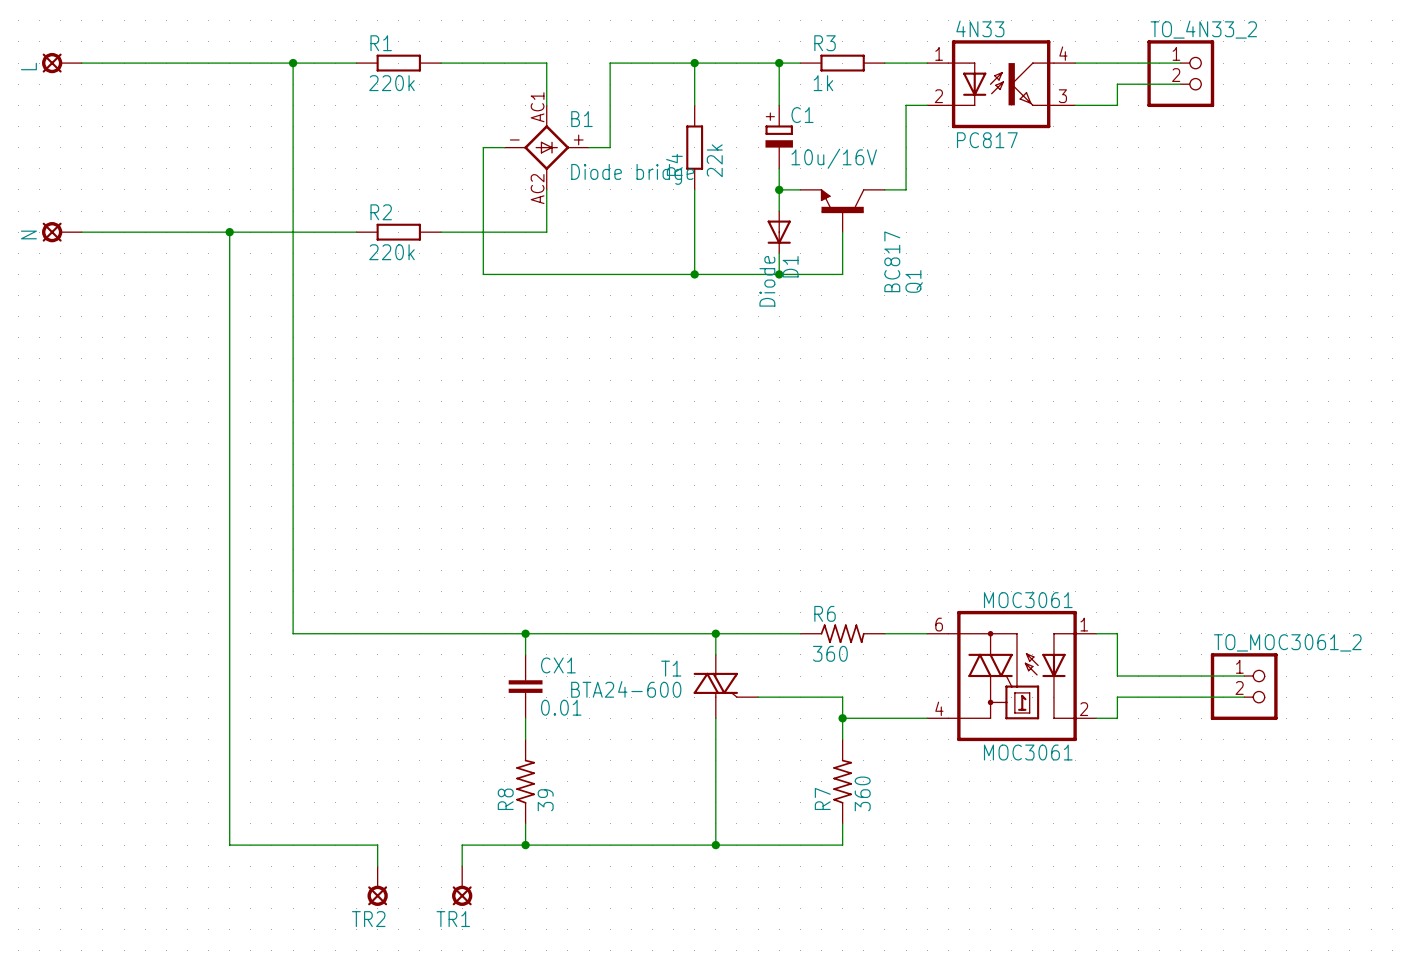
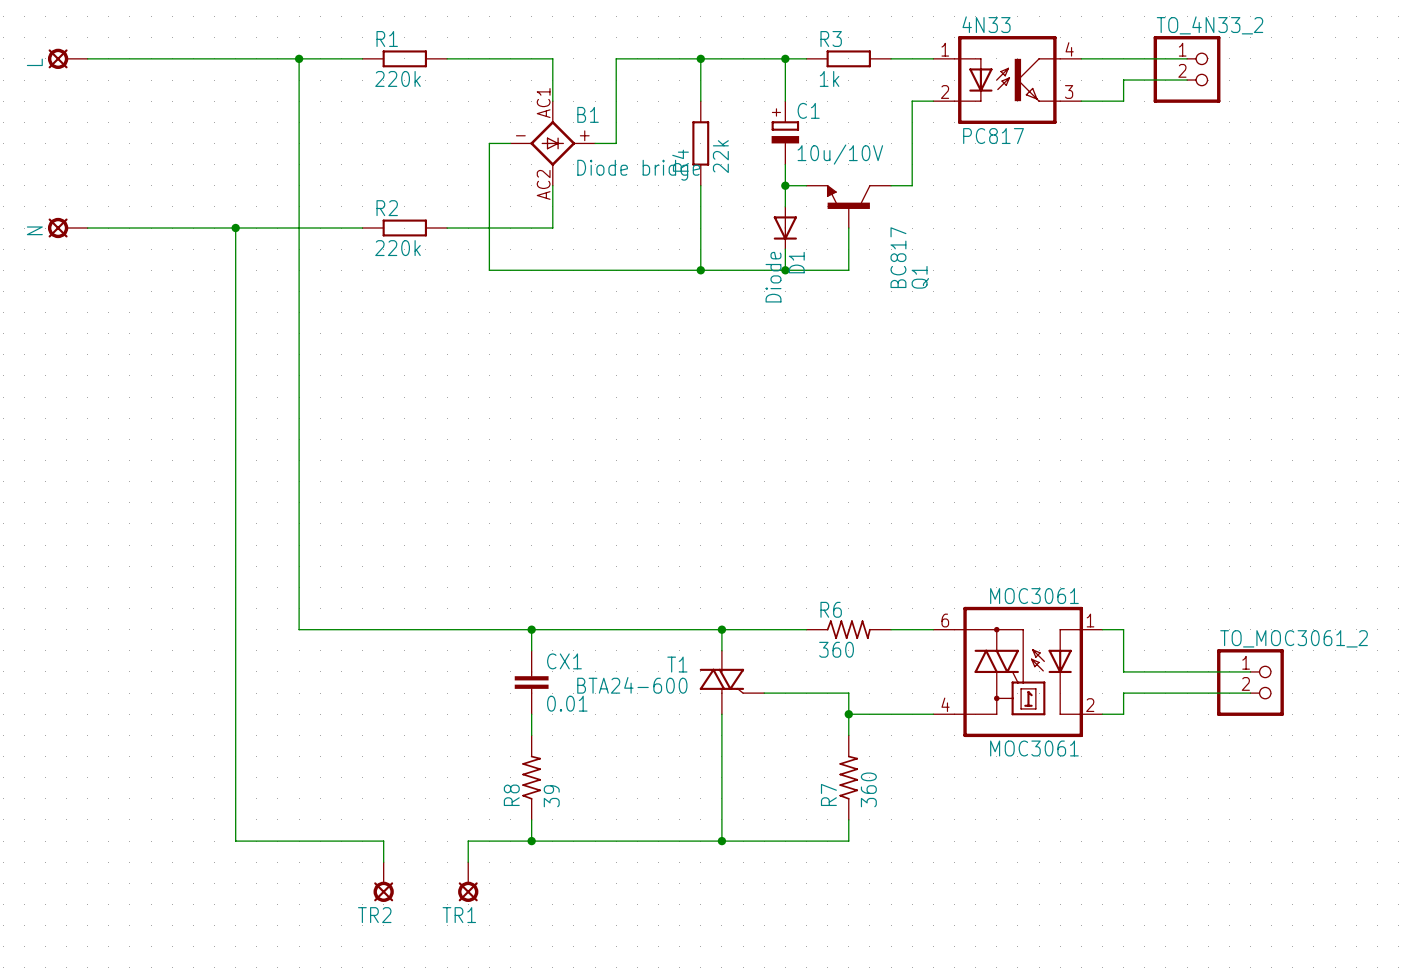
C1 value: 10u/16V (834, 158) -> 10u/10V (840, 154)

